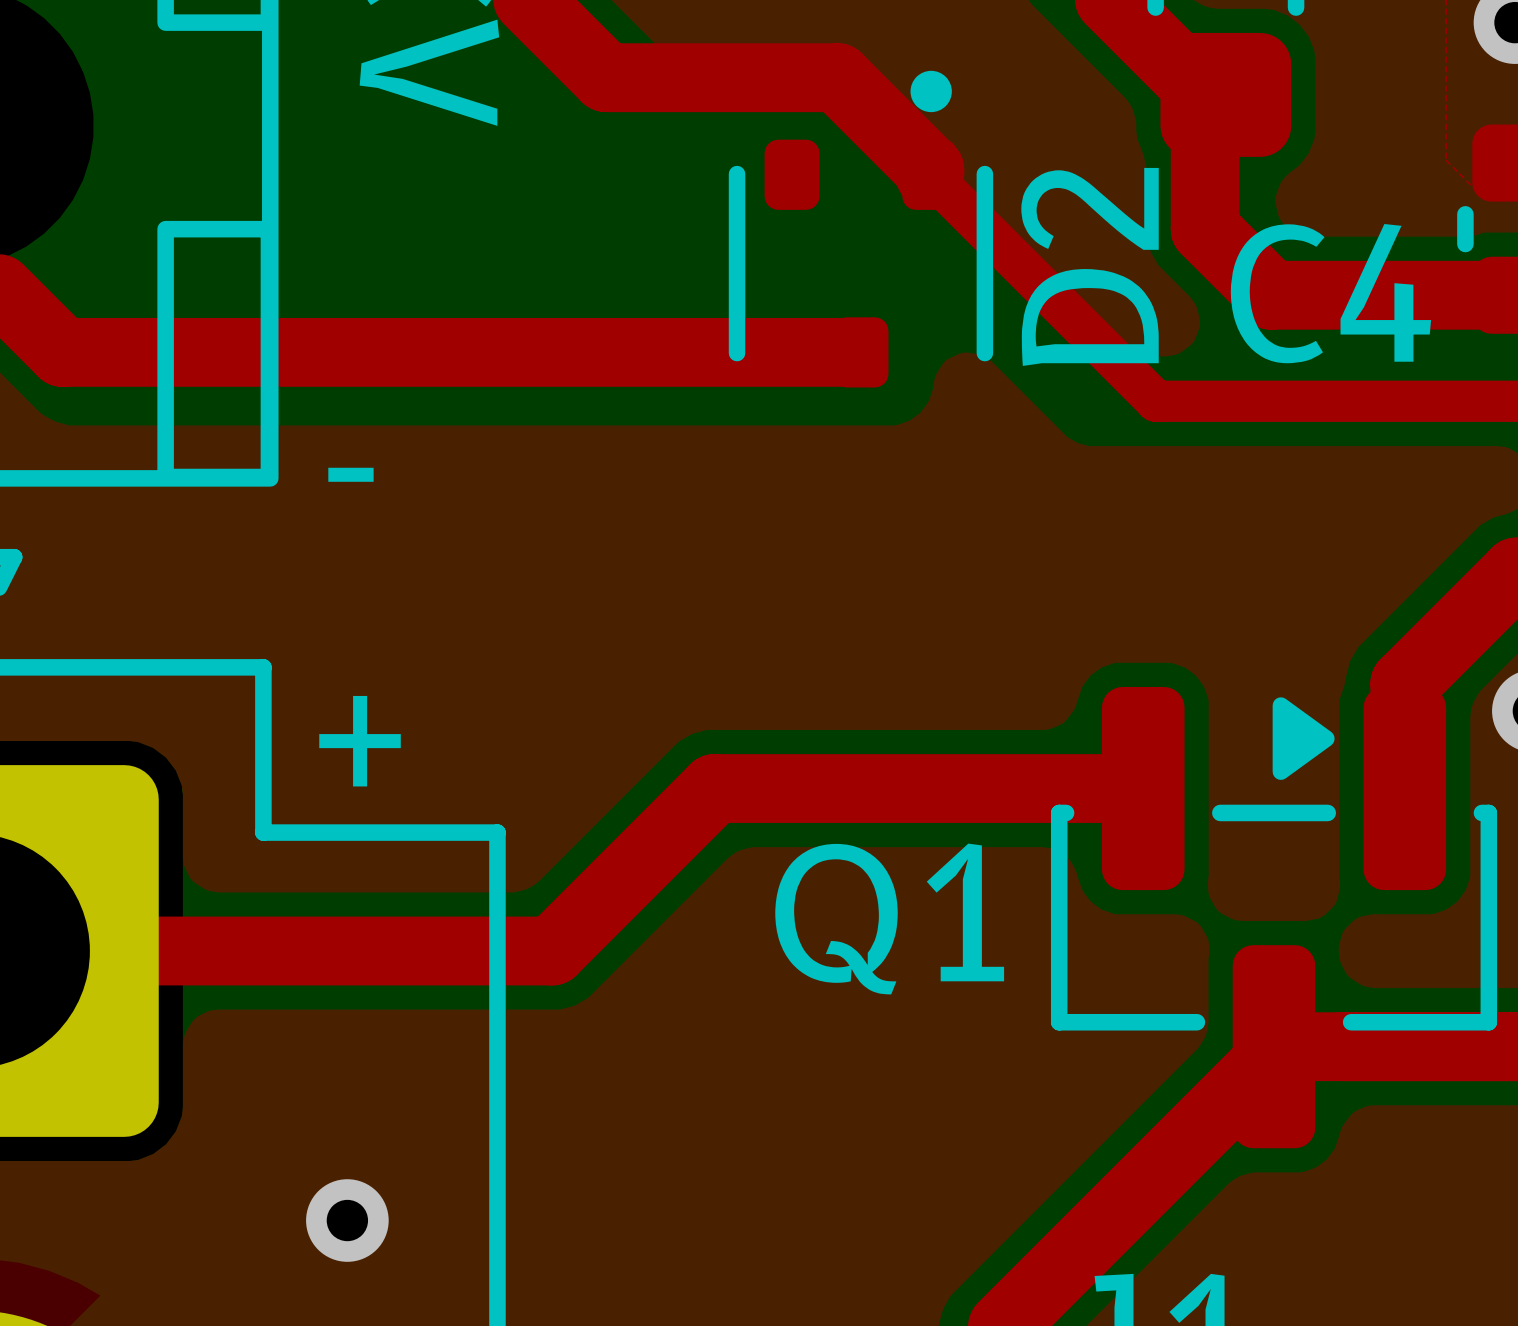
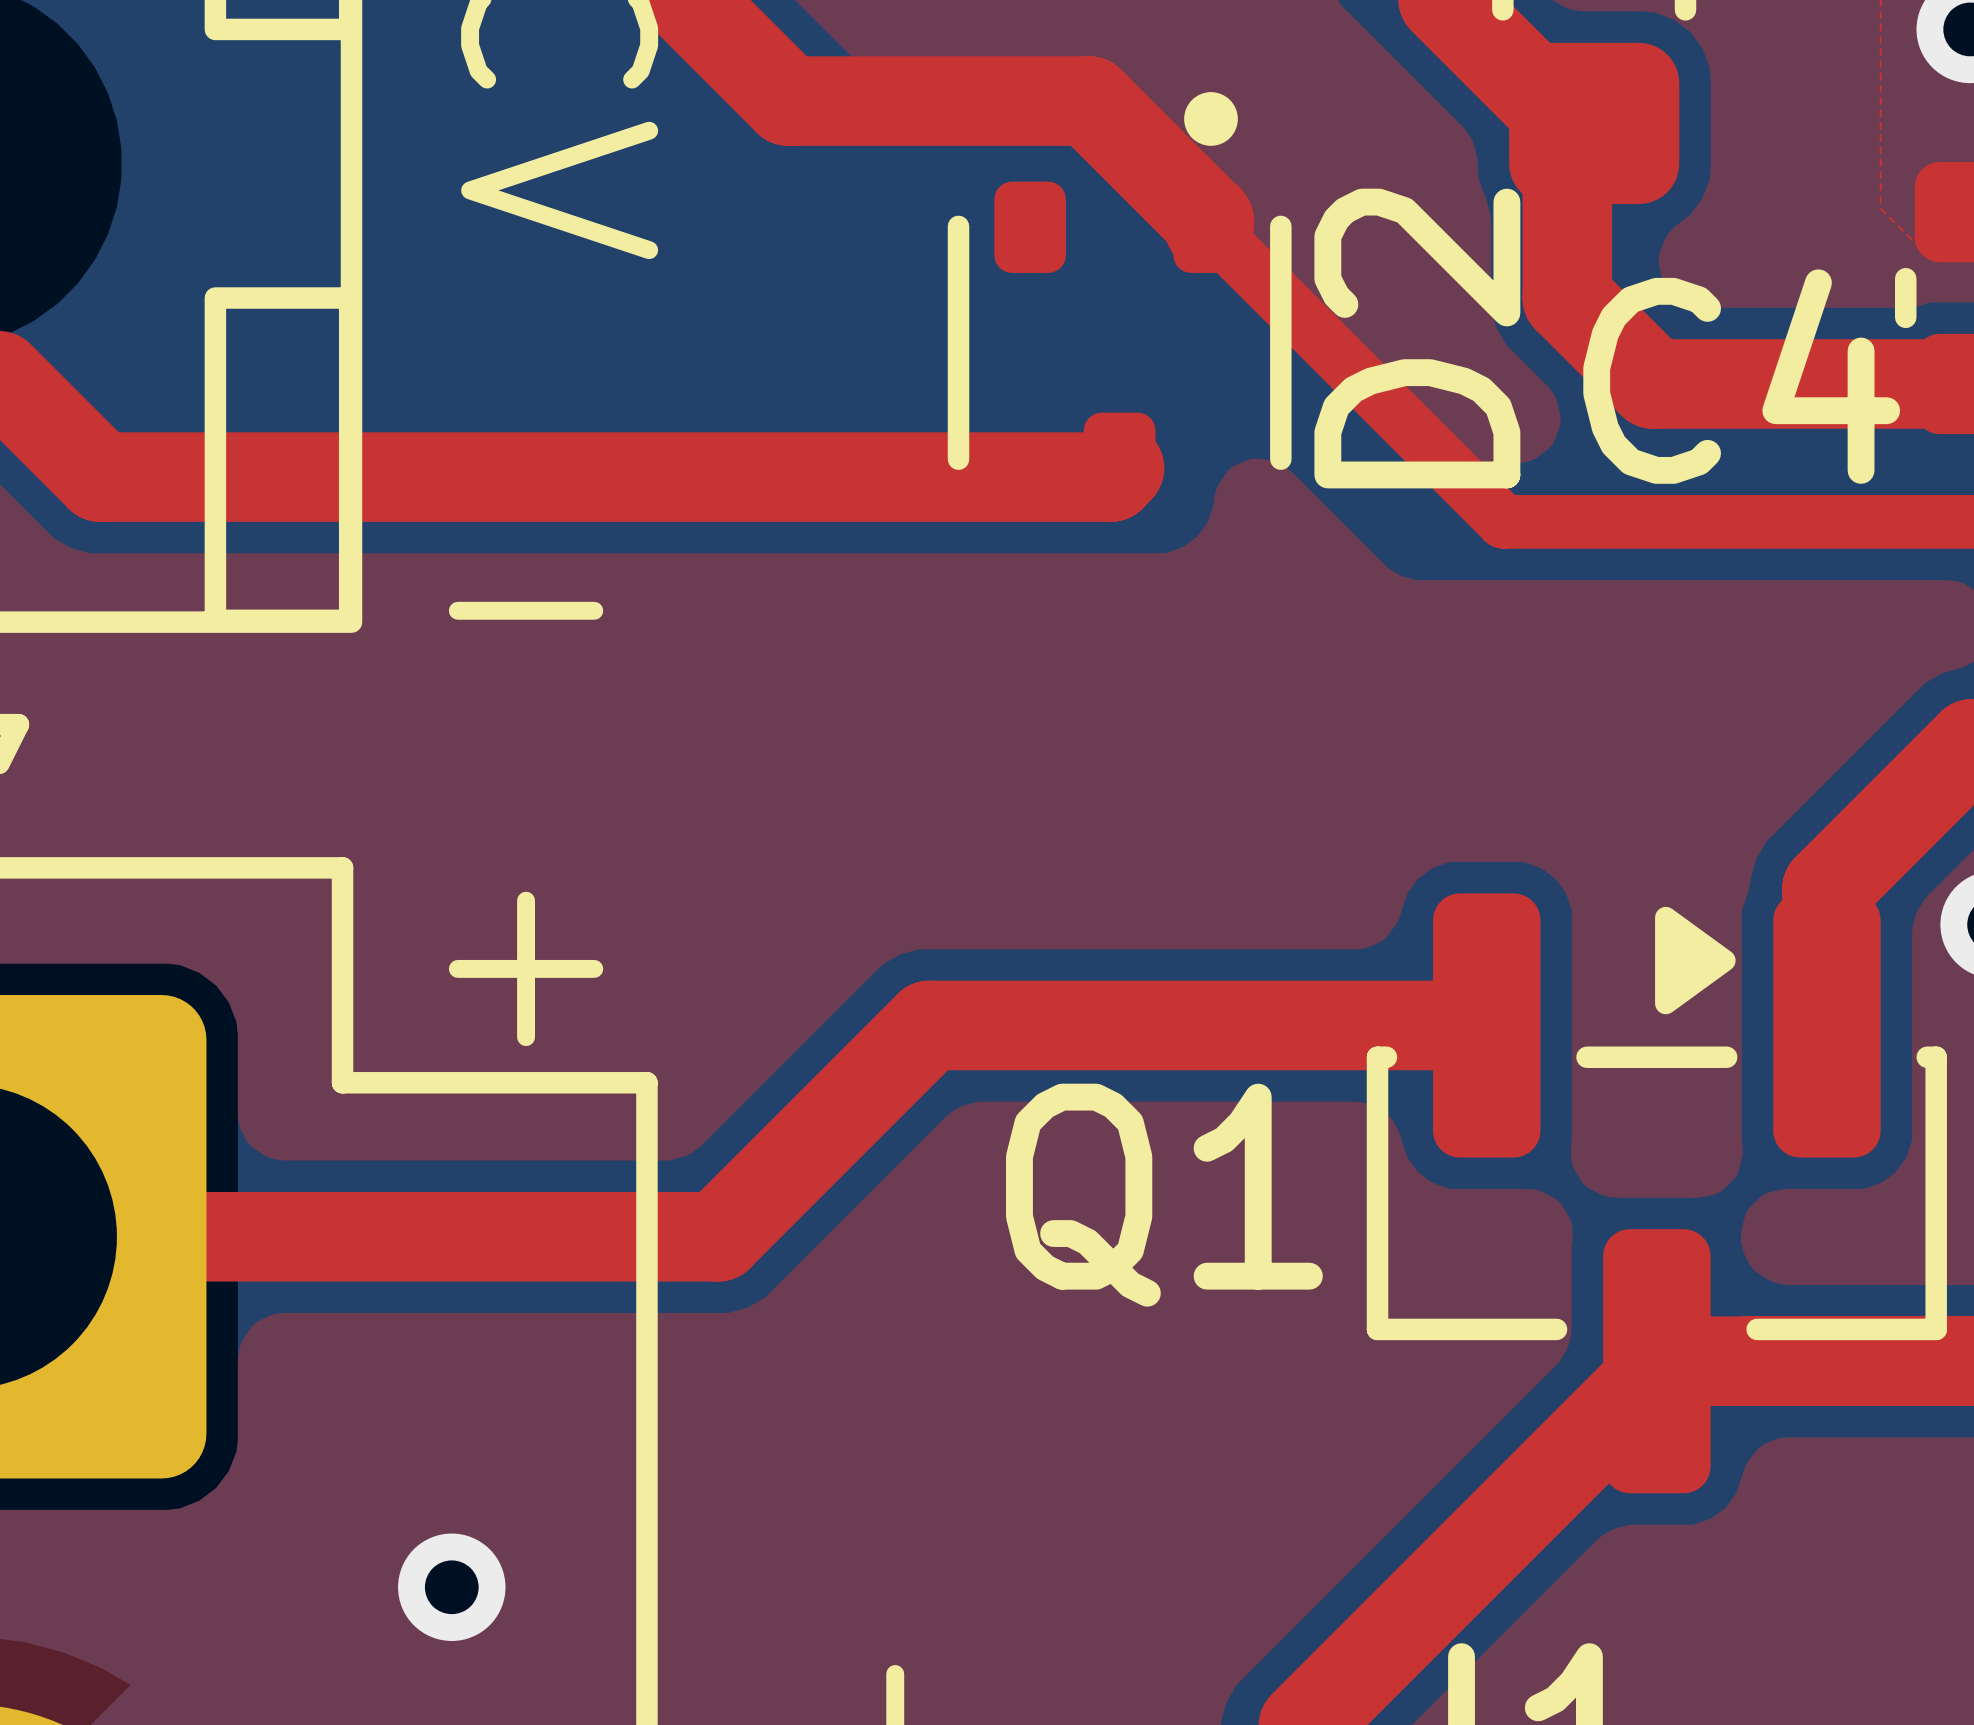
top track: (62, 352) (853, 352) -> (81, 458) (100, 477) (1110, 477) (1119, 468)

